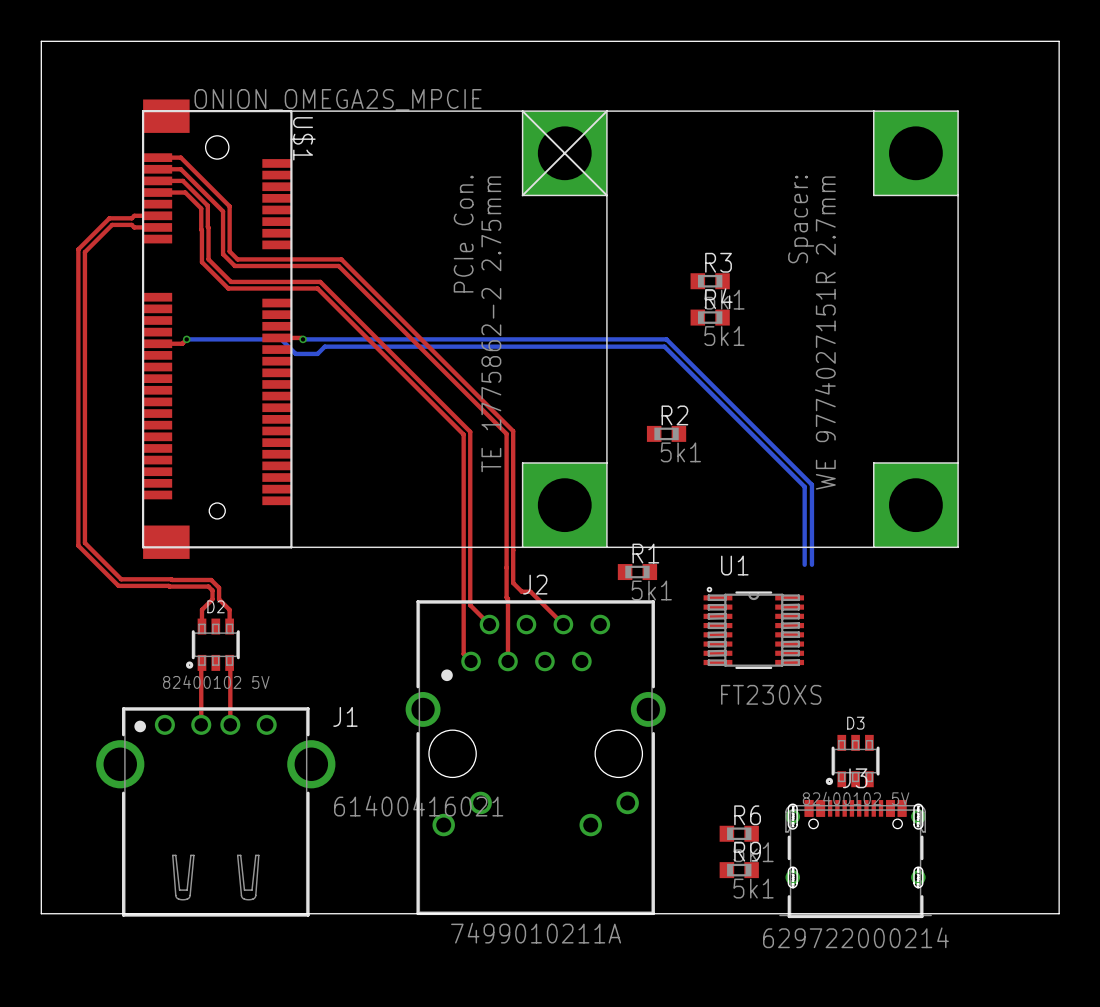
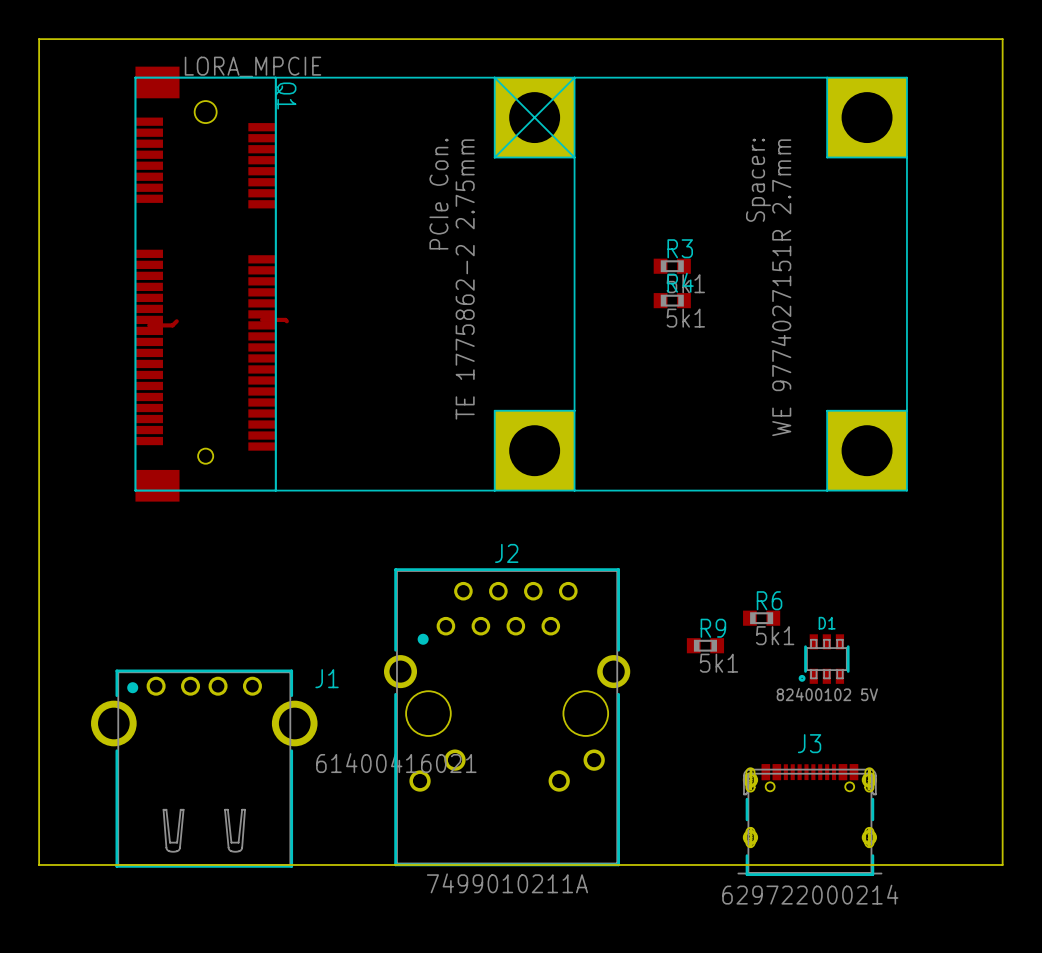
top track: (157, 157) (180, 157) (229, 206) (229, 251) (237, 259) (341, 259) (513, 431) (513, 583) (521, 591) (530, 591) (563, 624) -> none
top track: (157, 169) (180, 169) (223, 211) (223, 254) (234, 265) (338, 265) (506, 433) (507, 661) -> none
top track: (157, 180) (182, 180) (207, 205) (208, 259) (231, 281) (320, 281) (470, 431) (470, 605) (489, 624) -> none
top track: (157, 192) (185, 192) (201, 208) (201, 262) (228, 288) (317, 288) (463, 434) (463, 654) (471, 661) -> none
top track: (157, 215) (109, 218) (78, 249) (78, 545) (118, 585) (208, 586) (212, 590) (212, 599) (201, 609) (201, 626) -> none
top track: (157, 227) (112, 224) (84, 252) (84, 542) (121, 579) (211, 580) (219, 587) (219, 599) (229, 609) (229, 626) -> none
Q1: none -> LORA_MPCIE (521, 284)
U$1: ONION_OMEGA2S_MPCIE (550, 329) -> none
bottom track: (186, 339) (281, 339) (295, 353) (317, 353) (324, 346) (664, 346) (804, 486) (804, 564) -> none
via: (186, 339) -> none
bottom track: (303, 339) (666, 339) (811, 484) (811, 564) -> none
via: (303, 339) -> none
R2: 5k1 (666, 433) -> none
R1: 5k1 (637, 572) -> none
U1: FT230XS (753, 627) -> none
D2: 82400102 5V (212, 644) -> none
top track: (201, 662) (201, 724) -> none
top track: (229, 662) (230, 724) -> none
D1: none -> 82400102 5V (824, 659)
D3: 82400102 5V (852, 761) -> none
J3 footprint: [779, 799, 932, 919] -> [737, 764, 883, 877]
R6 position: (739, 833) -> (761, 618)
R9 position: (739, 870) -> (705, 645)

